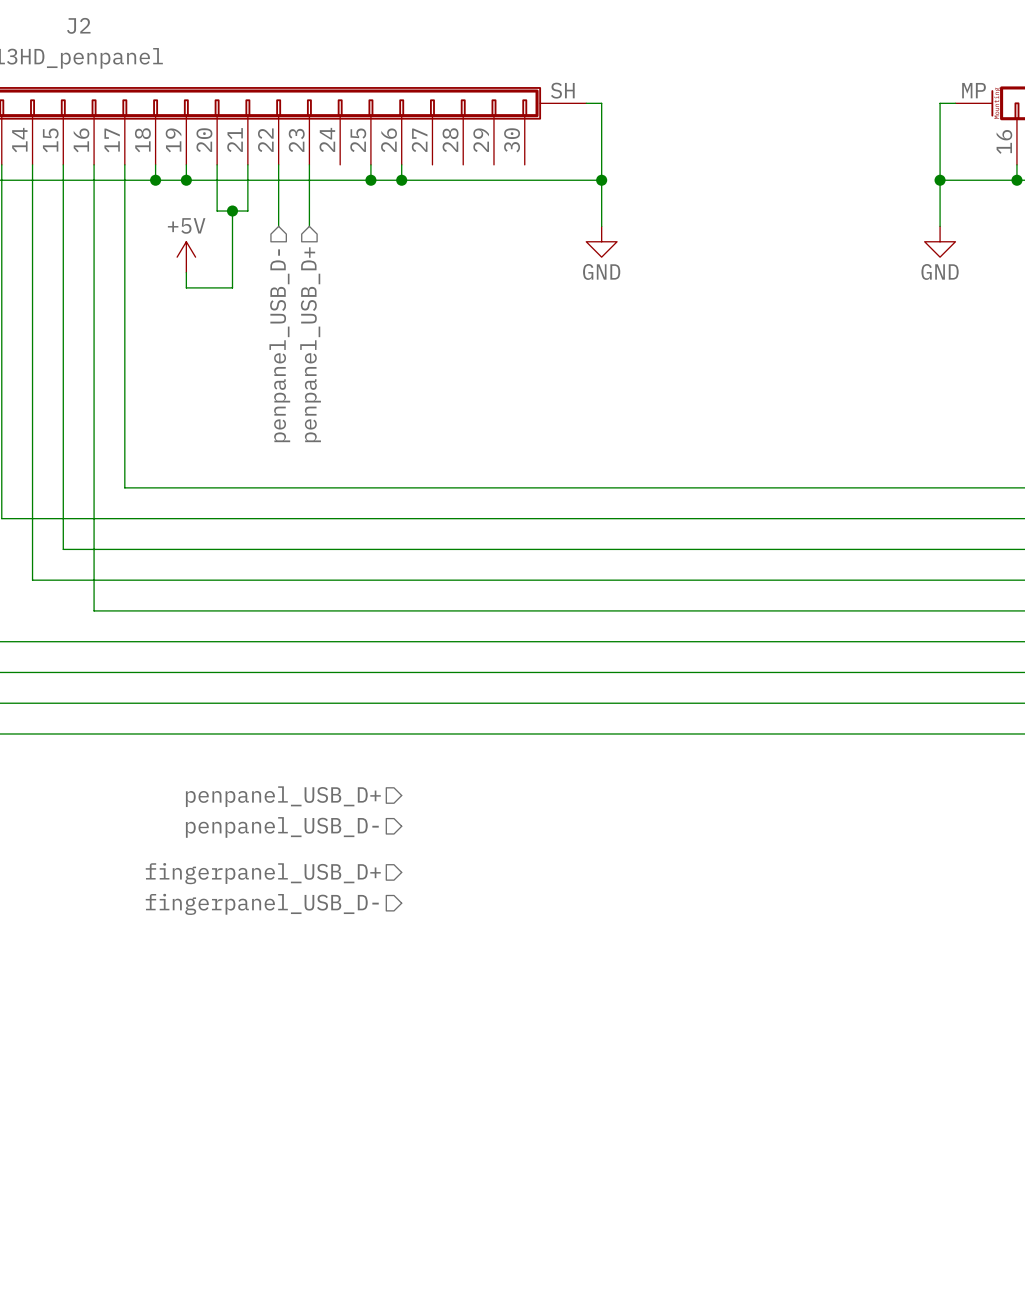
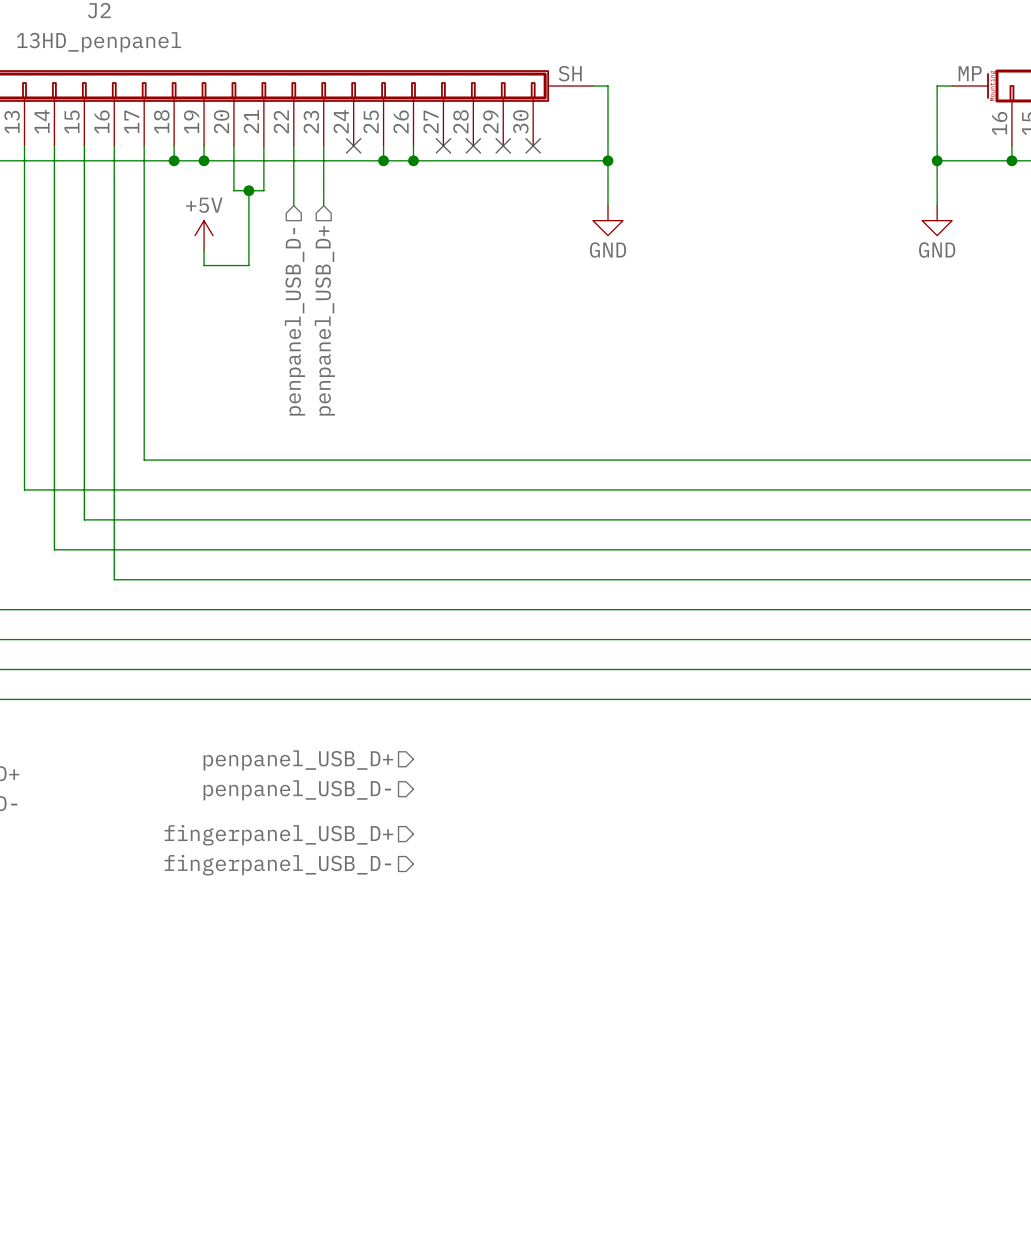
no-connect mark: none -> (353, 145)
no-connect mark: none -> (443, 145)
no-connect mark: none -> (473, 145)
no-connect mark: none -> (503, 145)
no-connect mark: none -> (533, 145)

